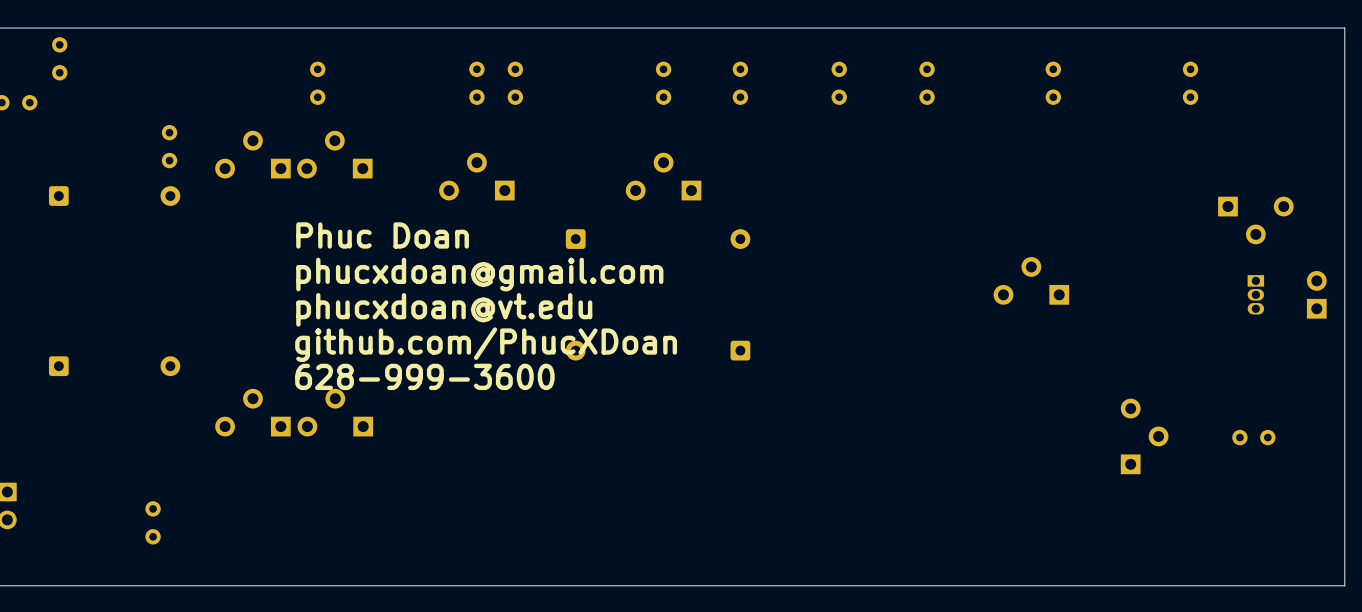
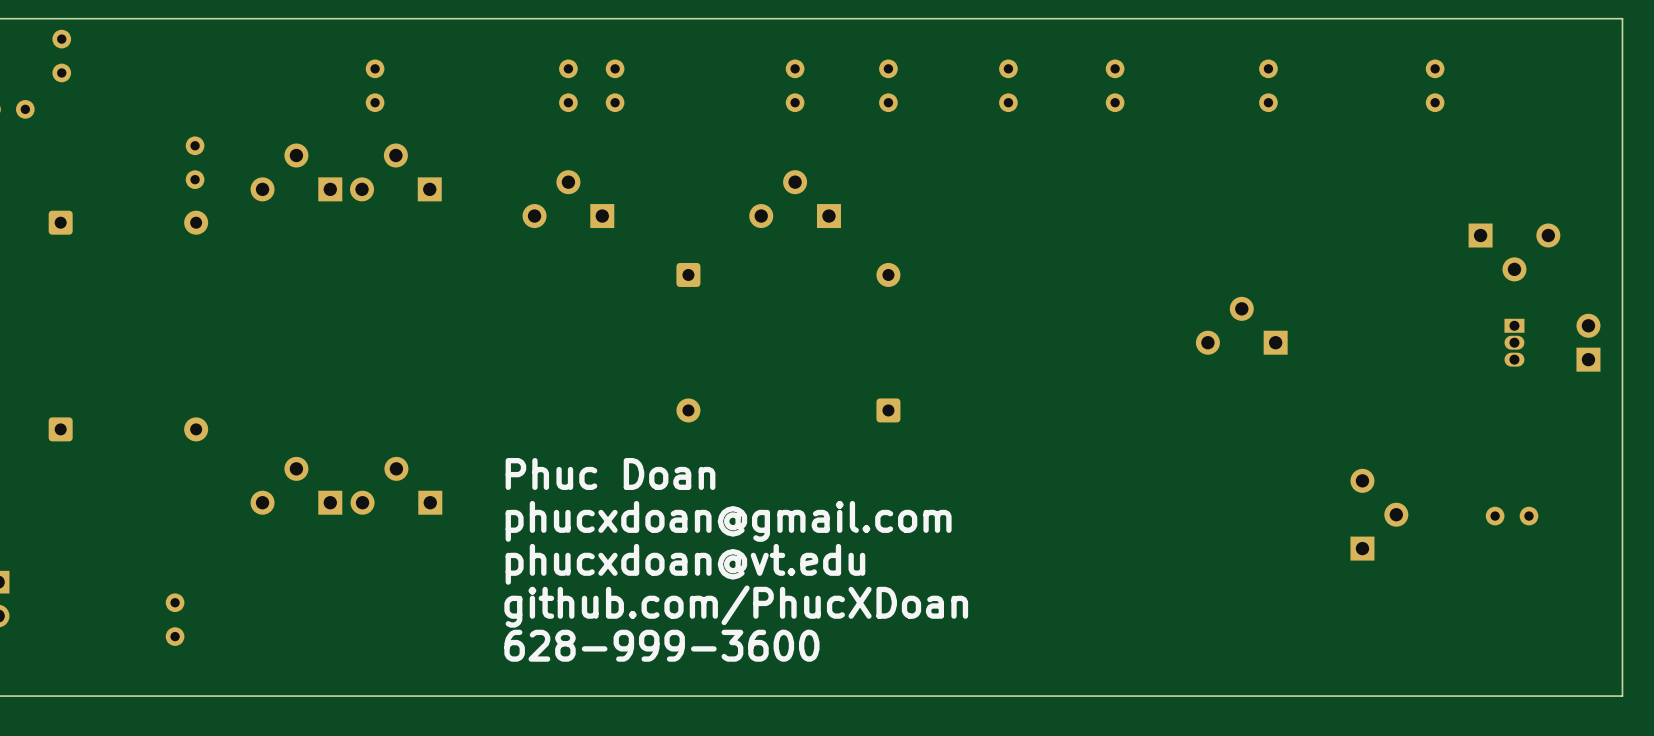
text position: Phuc Doan (382, 235) -> Phuc Doan (610, 473)
text position: phucxdoan@gmail.com (479, 274) -> phucxdoan@gmail.com (728, 521)
text position: phucxdoan@vt.edu (444, 309) -> phucxdoan@vt.edu (685, 564)
text position: github.com/PhucXDoan (486, 344) -> github.com/PhucXDoan (736, 606)
text position: 628-999-3600 (424, 376) -> 628-999-3600 (661, 645)

